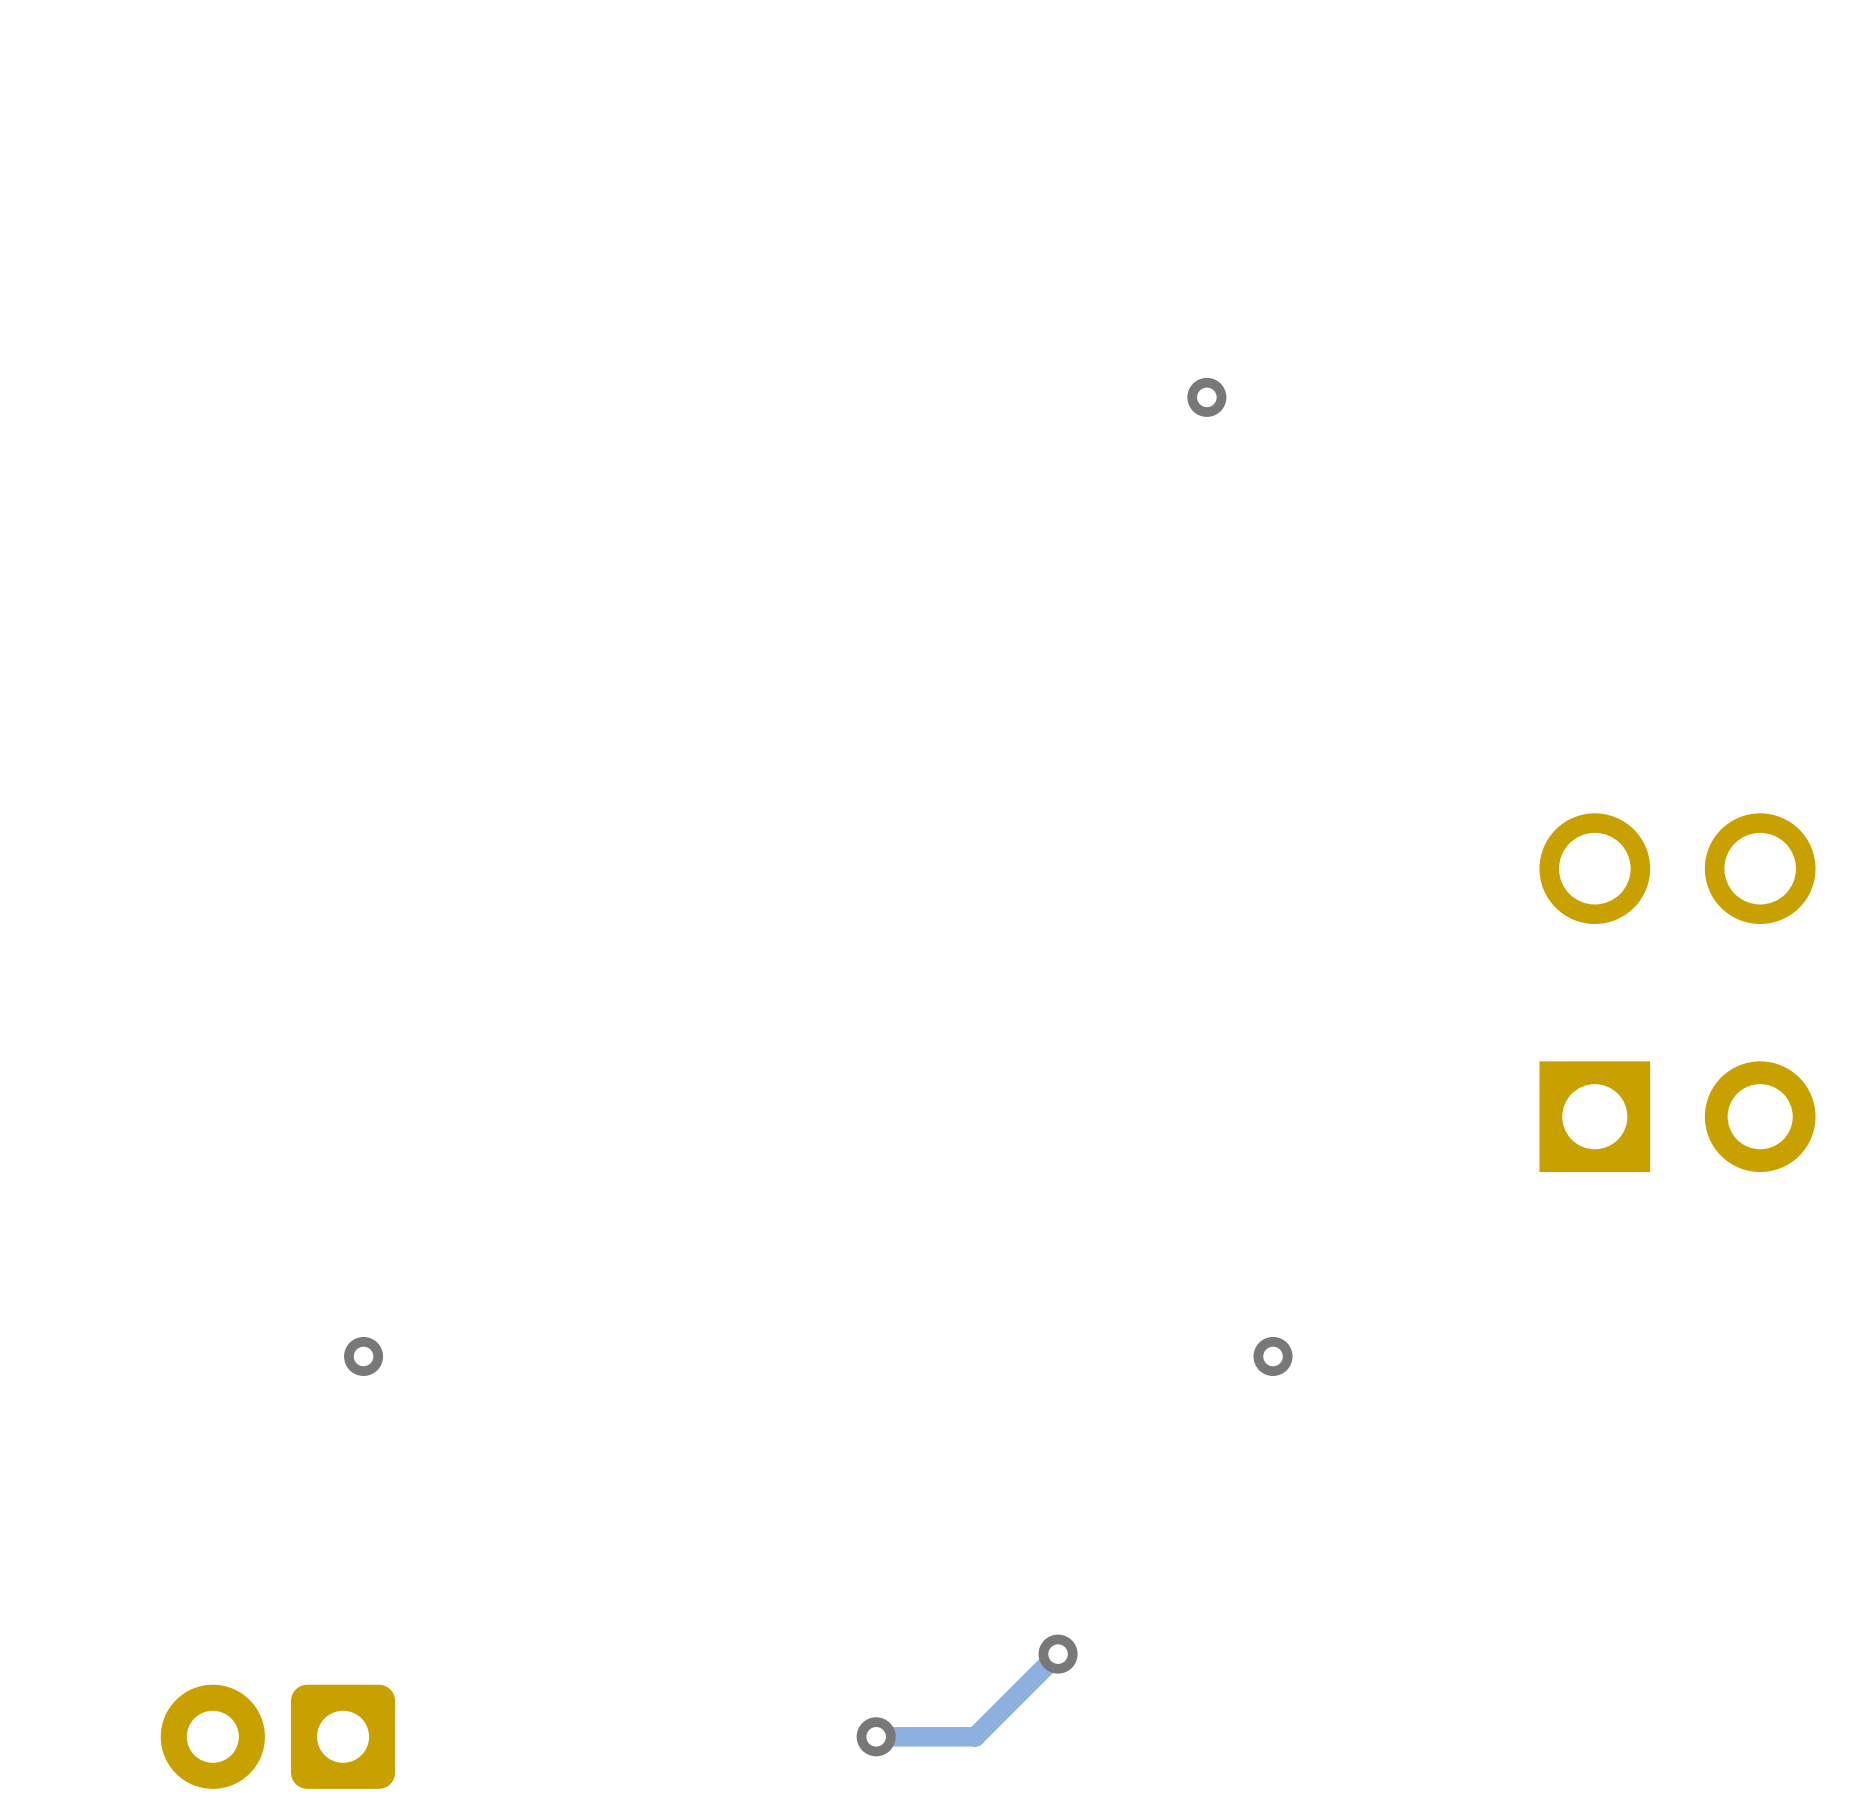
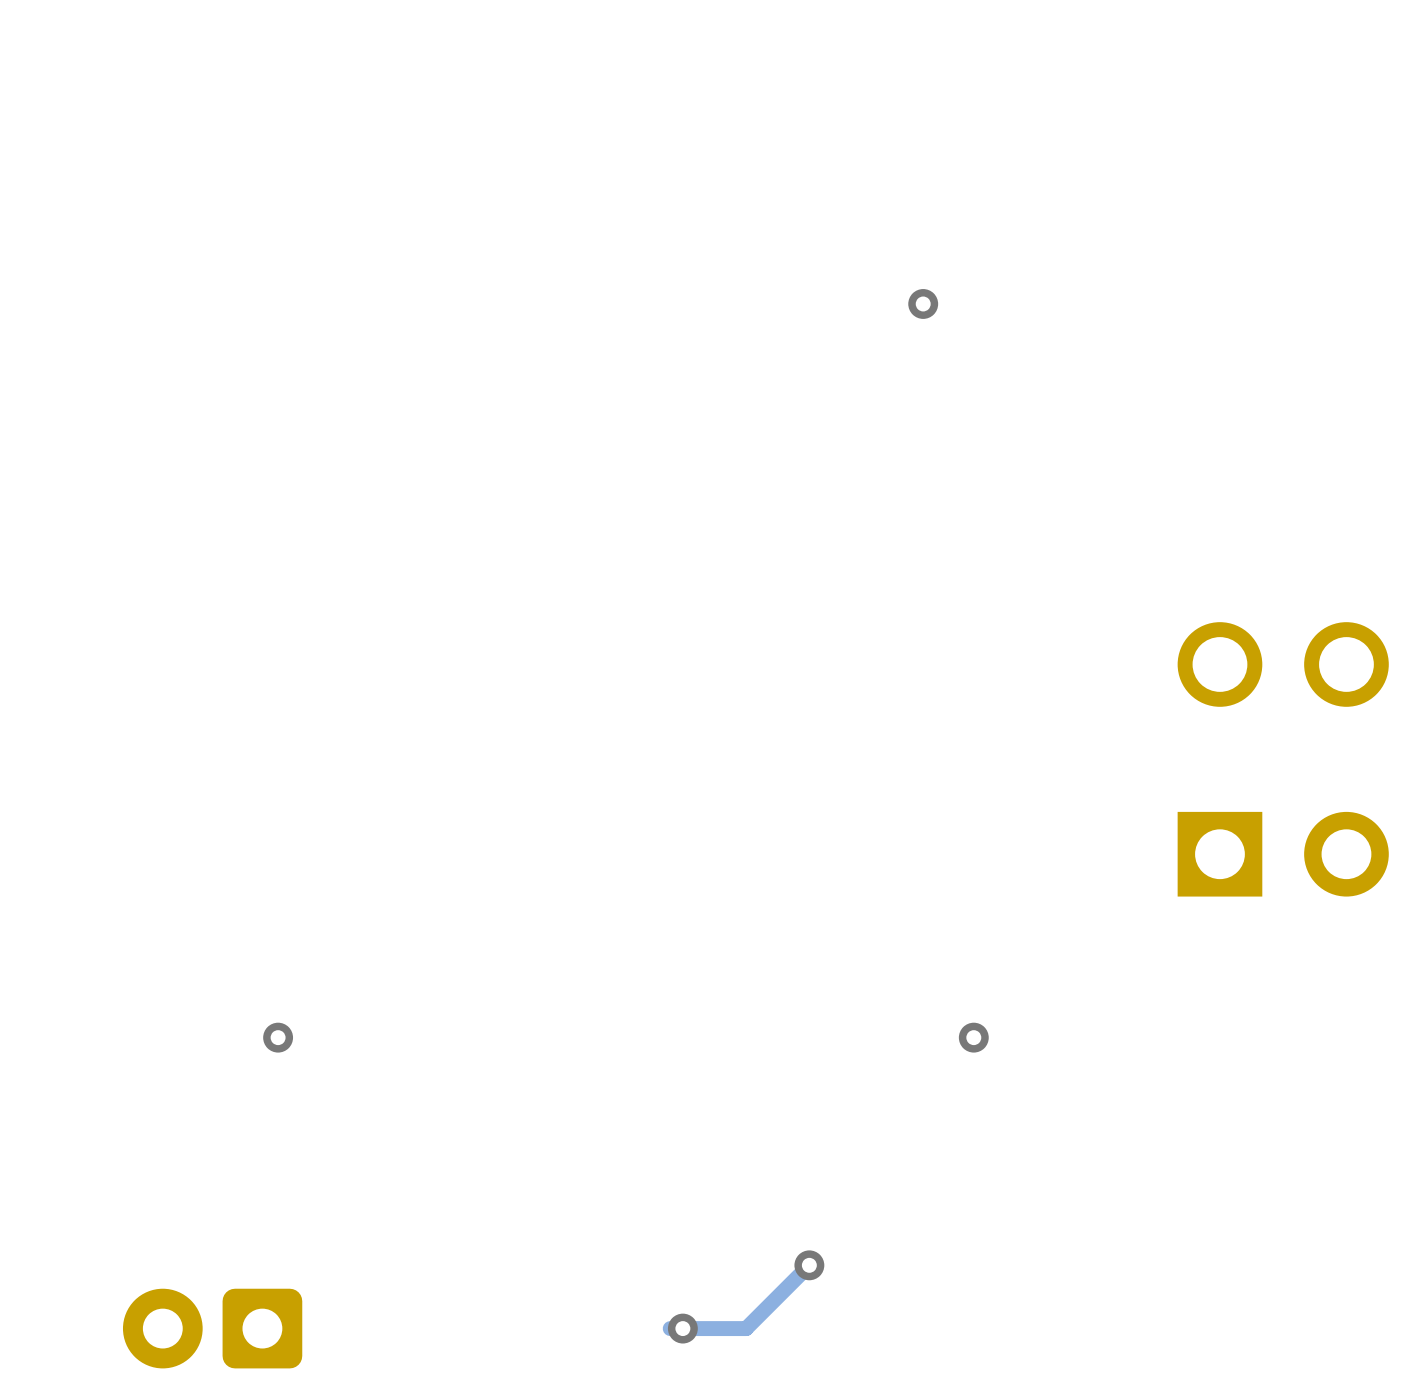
via position: (876, 1736) -> (682, 1328)

